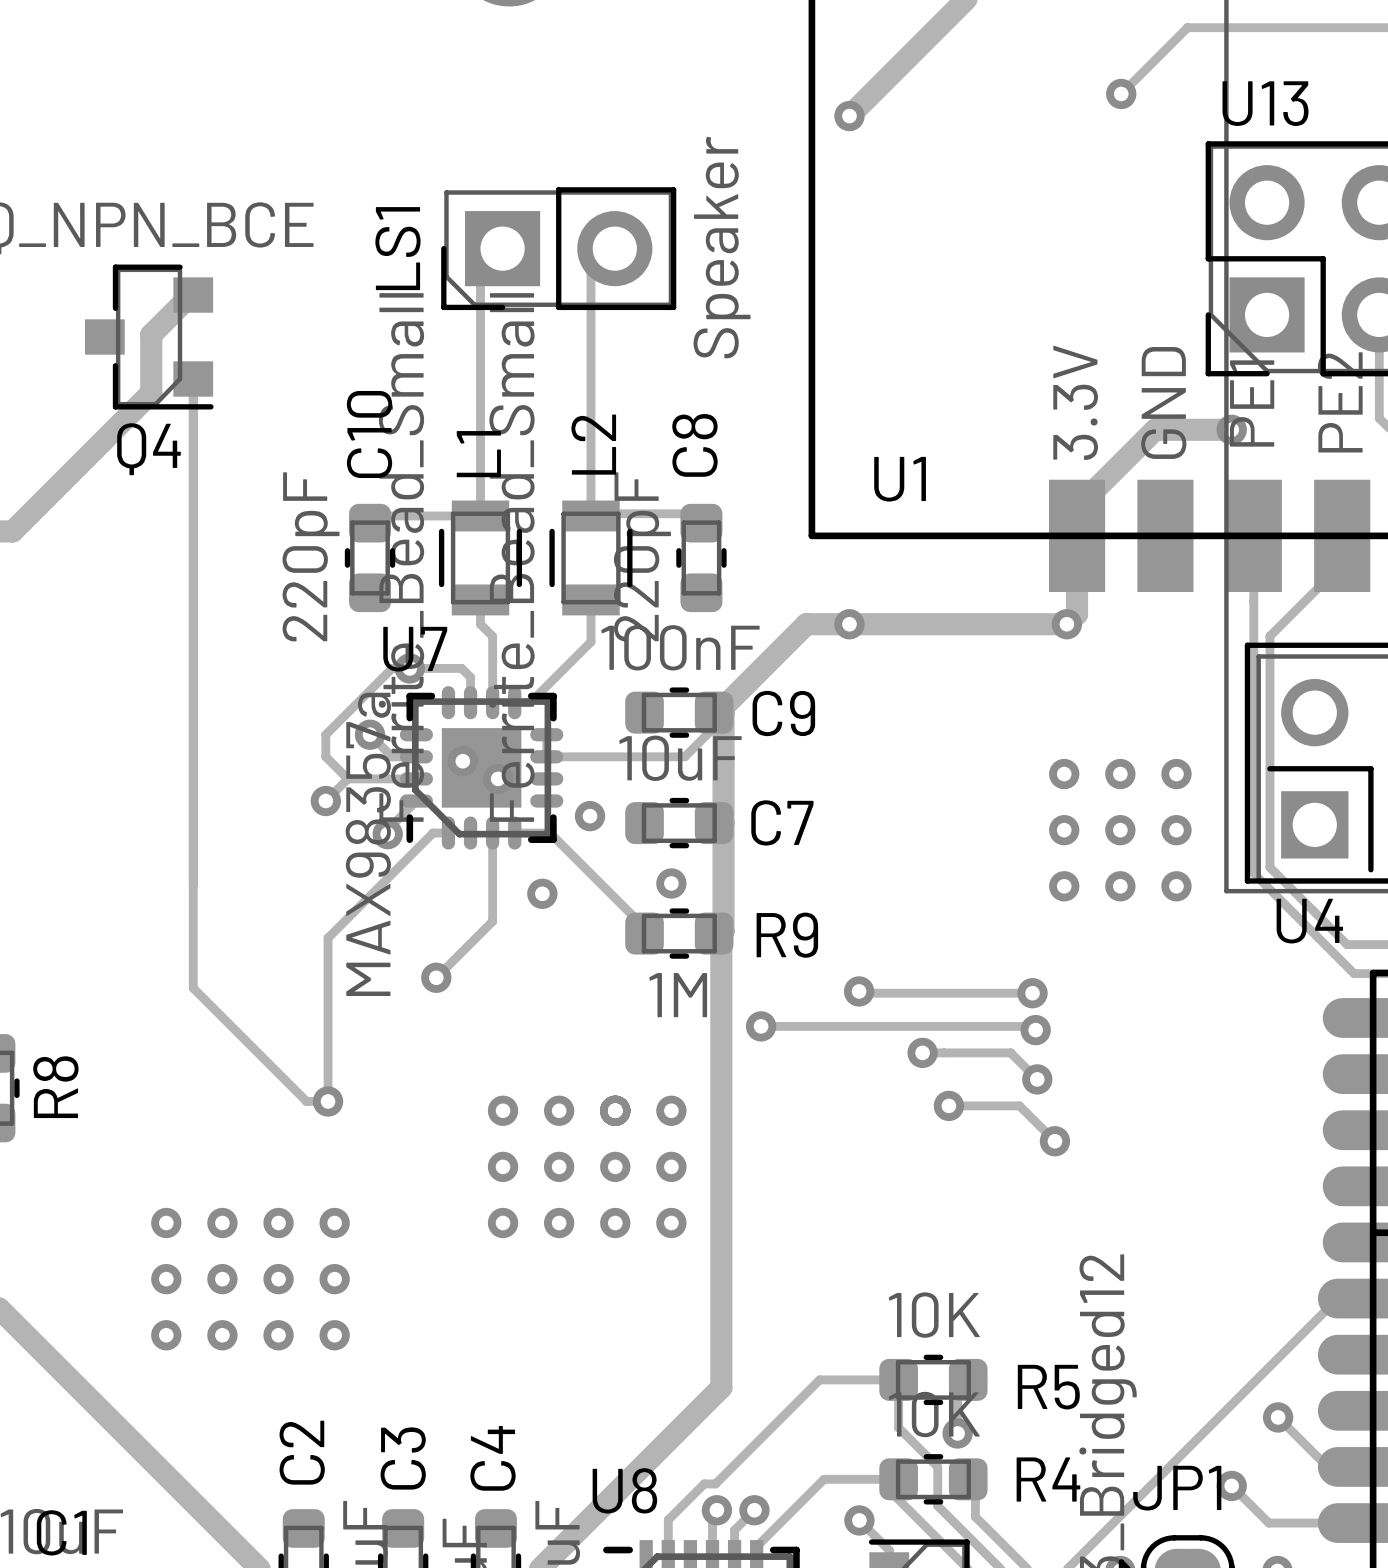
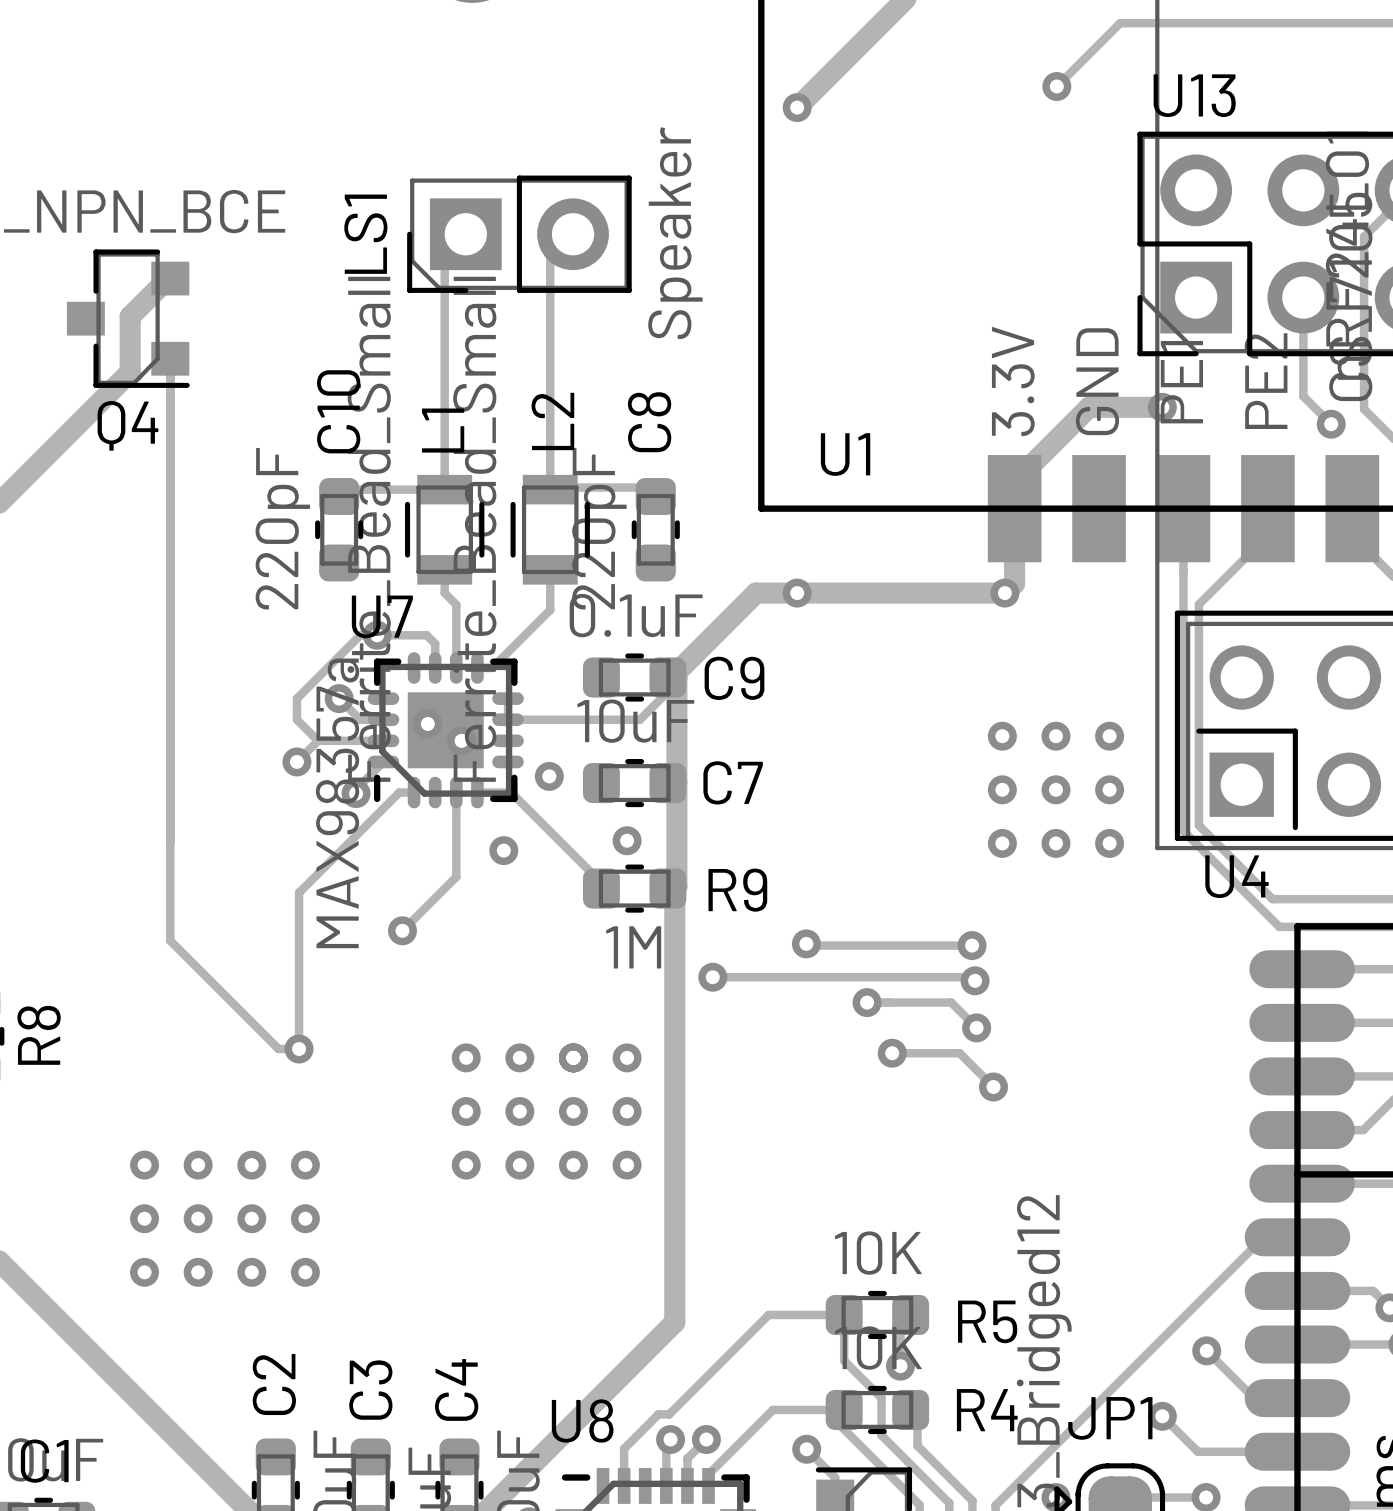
C9 value: 100nF (680, 647) -> 0.1uF (636, 615)

